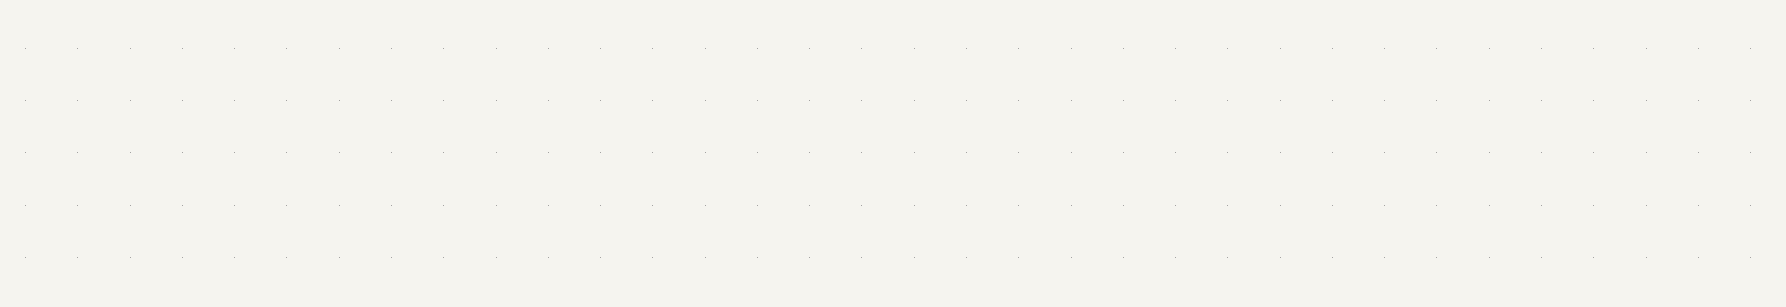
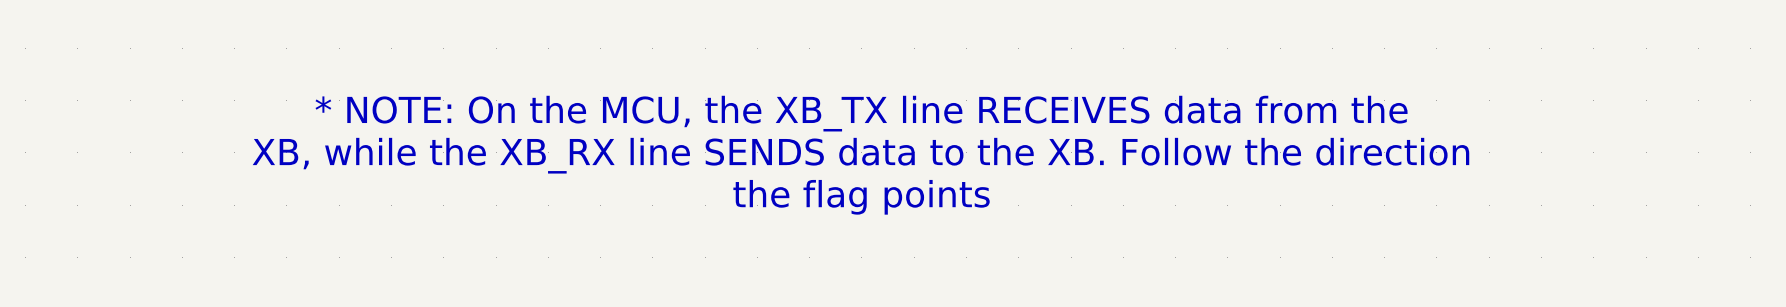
text: none -> * NOTE: On the MCU, the XB_TX line RECEIVES data from the (861, 113)
text: none -> XB, while the XB_RX line SENDS data to the XB. Follow the direction (860, 155)
text: none -> the flag points (861, 197)

